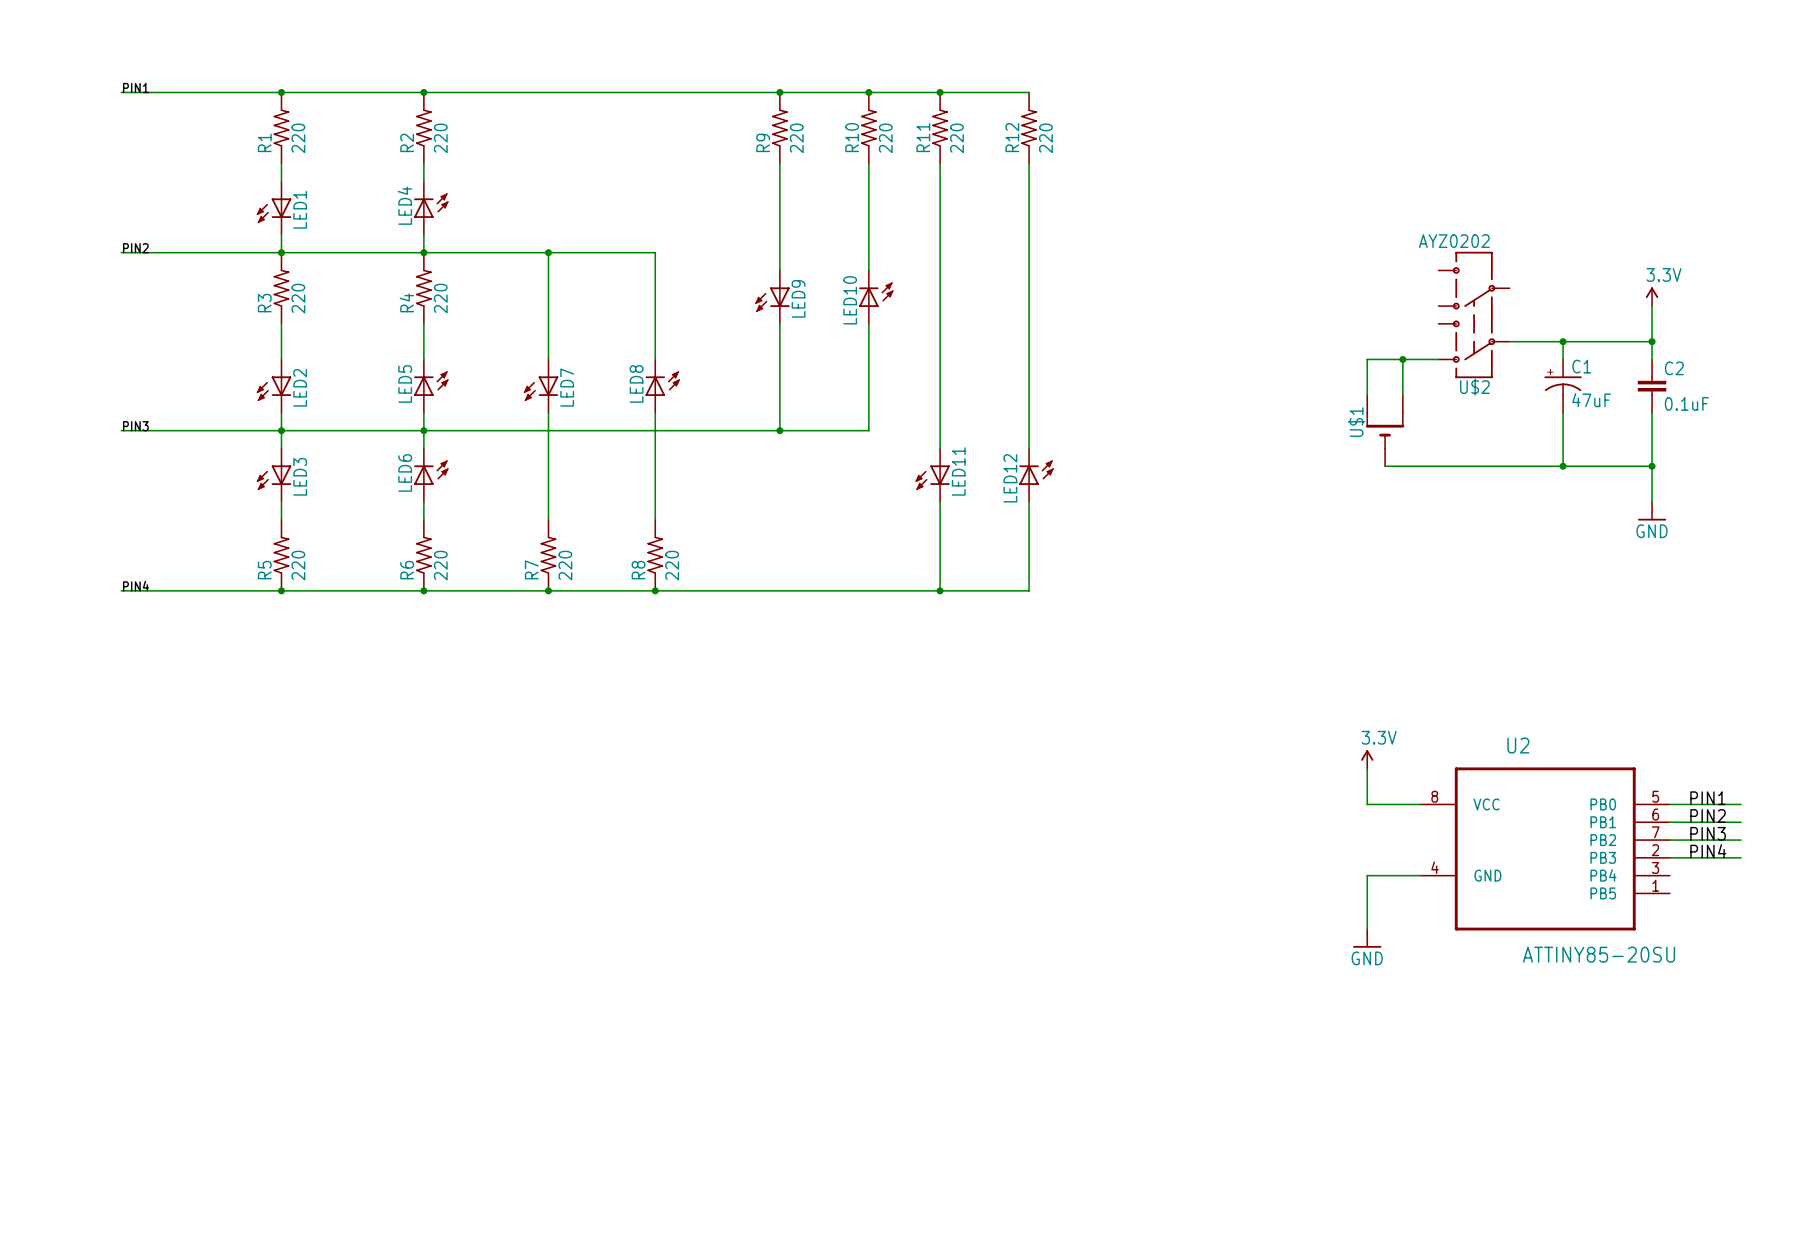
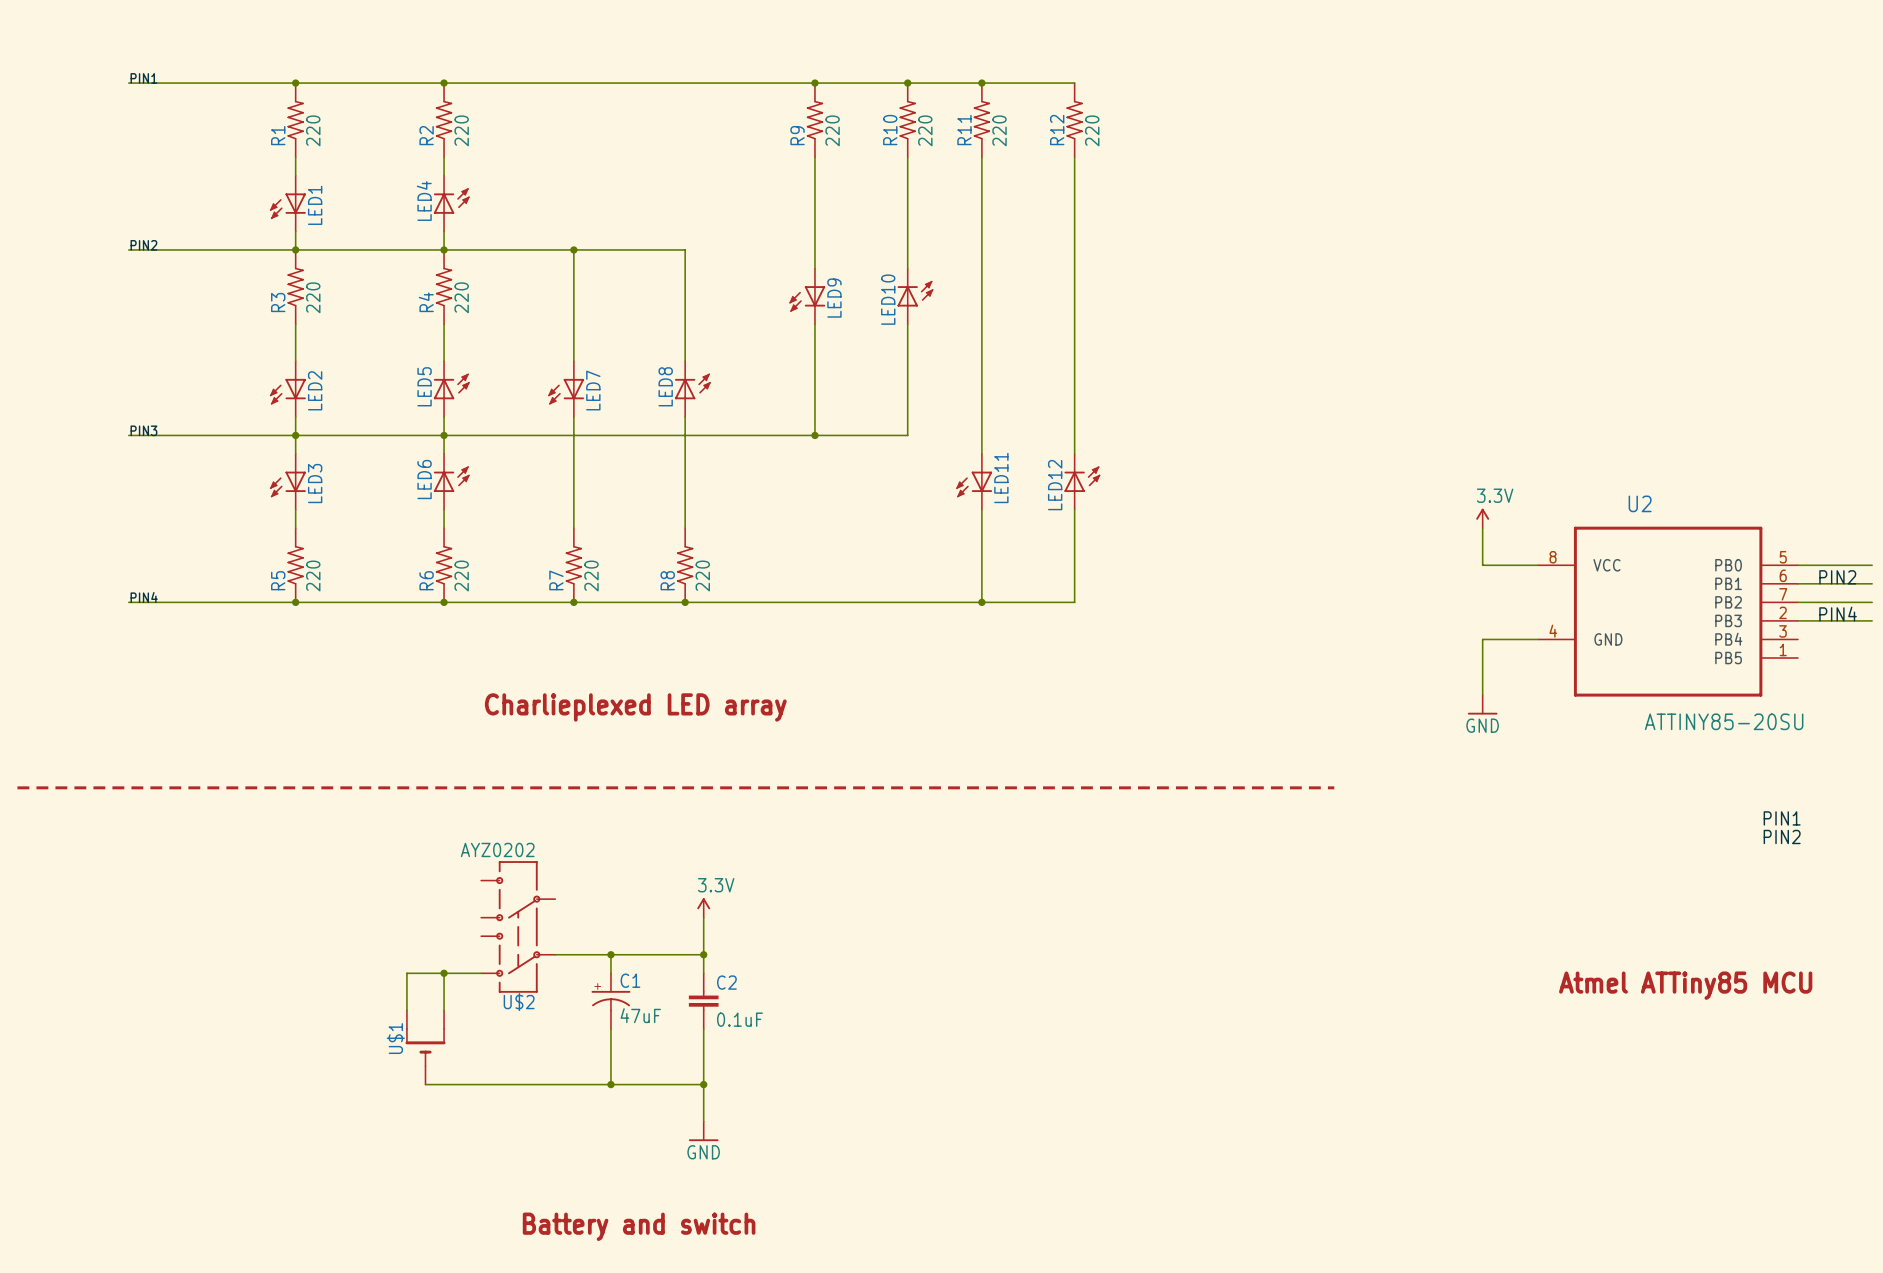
power symbol: 3.3V (1652, 296) -> none
wire: (1652, 306) (1652, 359) -> none
U$2 position: (1474, 314) -> (518, 926)
wire: (1509, 341) (1652, 341) -> none
wire: (1563, 341) (1563, 359) -> none
junction: (1563, 341) -> none
junction: (1652, 341) -> none
wire: (1402, 359) (1402, 395) -> none
junction: (1402, 359) -> none
wire: (1438, 359) (1367, 359) (1367, 395) -> none
C1 position: (1563, 386) -> (610, 1001)
C2 position: (1652, 386) -> (703, 1001)
wire: (1563, 412) (1563, 466) -> none
wire: (1652, 412) (1652, 501) -> none
U$1 position: (1385, 430) -> (425, 1047)
wire: (1385, 466) (1652, 466) -> none
junction: (1563, 466) -> none
junction: (1652, 466) -> none
power symbol: none -> 3.3V (1482, 518)
power symbol: GND (1652, 511) -> none
wire: none -> (1482, 528) (1482, 565) (1538, 565)
wire: none -> (1797, 565) (1872, 565)
label: none -> PIN2 (1837, 577)
wire: none -> (1797, 583) (1872, 583)
wire: none -> (1797, 602) (1872, 602)
label: none -> PIN4 (1838, 614)
wire: none -> (1797, 620) (1872, 620)
wire: none -> (1538, 639) (1482, 639) (1482, 695)
power symbol: none -> GND (1482, 704)
text: none -> Charlieplexed LED array (635, 707)
power symbol: 3.3V (1367, 759) -> none
line: none -> (17, 787) (1334, 787)
wire: (1367, 768) (1367, 804) (1420, 804) -> none
wire: (1669, 804) (1741, 804) -> none
wire: (1669, 822) (1741, 822) -> none
label: PIN3 (1708, 833) -> none
wire: (1669, 840) (1741, 840) -> none
U2 position: (1545, 848) -> (1668, 611)
label: PIN4 (1708, 851) -> none
wire: (1669, 857) (1741, 857) -> none
wire: (1420, 875) (1367, 875) (1367, 929) -> none
power symbol: none -> 3.3V (703, 907)
wire: none -> (703, 917) (703, 973)
wire: none -> (555, 954) (703, 954)
wire: none -> (610, 954) (610, 973)
junction: none -> (610, 954)
junction: none -> (703, 954)
power symbol: GND (1367, 938) -> none
wire: none -> (444, 973) (444, 1010)
junction: none -> (444, 973)
wire: none -> (481, 973) (406, 973) (406, 1010)
text: none -> Atmel ATTiny85 MCU (1685, 985)
wire: none -> (610, 1028) (610, 1084)
wire: none -> (703, 1028) (703, 1121)
wire: none -> (425, 1084) (703, 1084)
junction: none -> (610, 1084)
junction: none -> (703, 1084)
power symbol: none -> GND (703, 1131)
text: none -> Battery and switch (639, 1226)

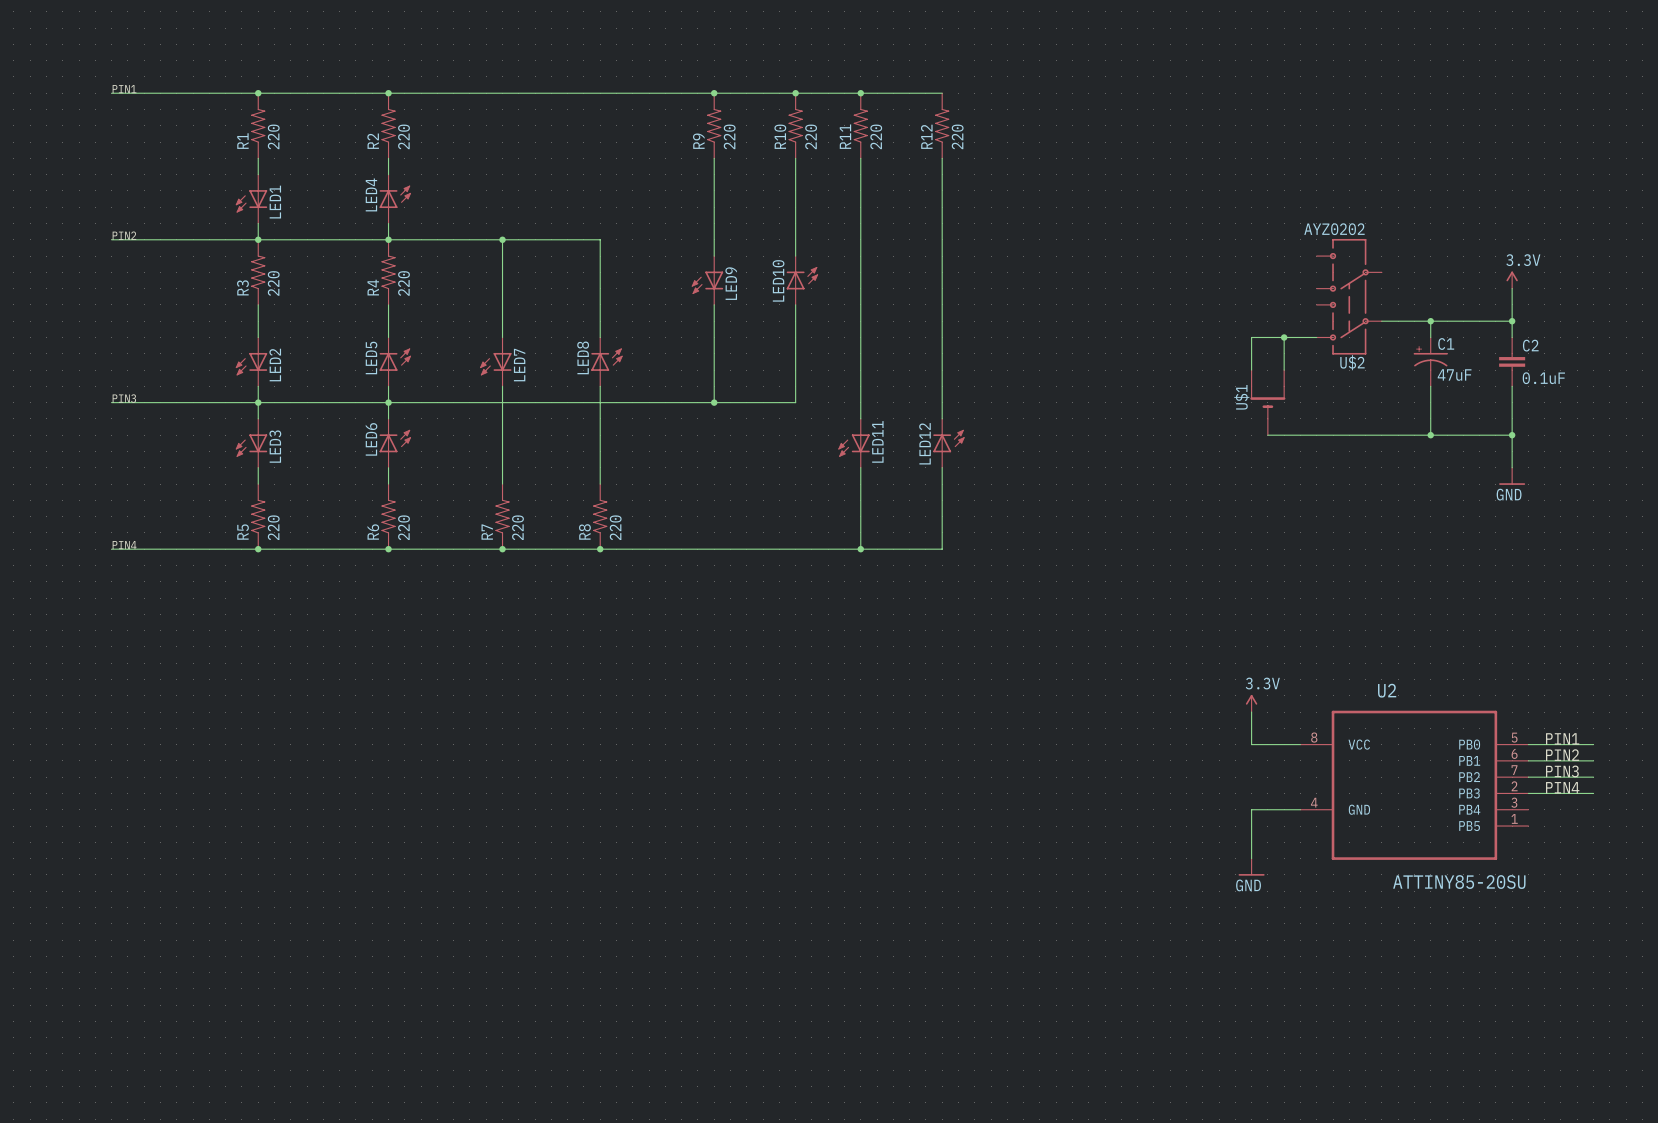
power symbol: none -> 3.3V (1512, 280)
wire: none -> (1512, 288) (1512, 337)
wire: none -> (1381, 321) (1512, 321)
wire: none -> (1430, 321) (1430, 337)
junction: none -> (1430, 321)
junction: none -> (1512, 321)
wire: none -> (1284, 337) (1284, 370)
junction: none -> (1284, 337)
wire: none -> (1316, 337) (1251, 337) (1251, 370)
wire: none -> (1430, 386) (1430, 435)
wire: none -> (1512, 386) (1512, 467)
wire: none -> (1267, 435) (1512, 435)
junction: none -> (1430, 435)
junction: none -> (1512, 435)
power symbol: 3.3V (1482, 518) -> none
power symbol: none -> GND (1512, 476)
wire: (1482, 528) (1482, 565) (1538, 565) -> none
wire: (1797, 565) (1872, 565) -> none
label: PIN2 (1837, 577) -> none
wire: (1797, 583) (1872, 583) -> none
wire: (1797, 602) (1872, 602) -> none
U2 position: (1668, 611) -> (1414, 785)
label: PIN4 (1838, 614) -> none
wire: (1797, 620) (1872, 620) -> none
wire: (1538, 639) (1482, 639) (1482, 695) -> none
power symbol: GND (1482, 704) -> none
text: Charlieplexed LED array (635, 707) -> none
power symbol: none -> 3.3V (1251, 703)
line: (17, 787) (1334, 787) -> none
wire: none -> (1251, 712) (1251, 744) (1300, 744)
wire: none -> (1528, 744) (1593, 744)
wire: none -> (1528, 760) (1593, 760)
label: none -> PIN3 (1562, 771)
wire: none -> (1528, 777) (1593, 777)
label: none -> PIN4 (1562, 787)
wire: none -> (1528, 793) (1593, 793)
wire: none -> (1300, 809) (1251, 809) (1251, 858)
power symbol: 3.3V (703, 907) -> none
wire: (703, 917) (703, 973) -> none
U$2 position: (518, 926) -> (1349, 296)
wire: (555, 954) (703, 954) -> none
wire: (610, 954) (610, 973) -> none
junction: (610, 954) -> none
junction: (703, 954) -> none
power symbol: none -> GND (1251, 867)
wire: (444, 973) (444, 1010) -> none
junction: (444, 973) -> none
wire: (481, 973) (406, 973) (406, 1010) -> none
text: Atmel ATTiny85 MCU (1685, 985) -> none
C1 position: (610, 1001) -> (1430, 361)
C2 position: (703, 1001) -> (1512, 361)
wire: (610, 1028) (610, 1084) -> none
wire: (703, 1028) (703, 1121) -> none
U$1 position: (425, 1047) -> (1267, 402)
wire: (425, 1084) (703, 1084) -> none
junction: (610, 1084) -> none
junction: (703, 1084) -> none
power symbol: GND (703, 1131) -> none
text: Battery and switch (639, 1226) -> none

